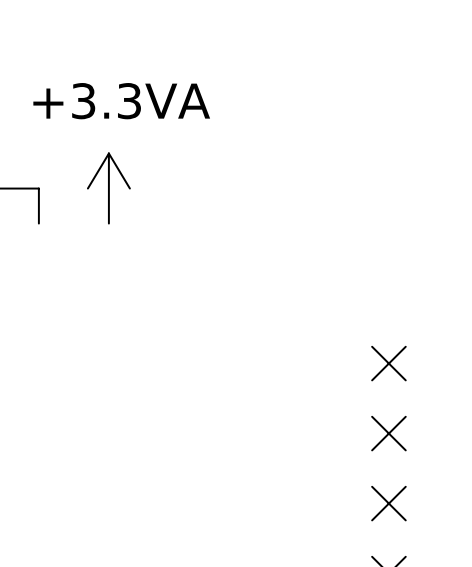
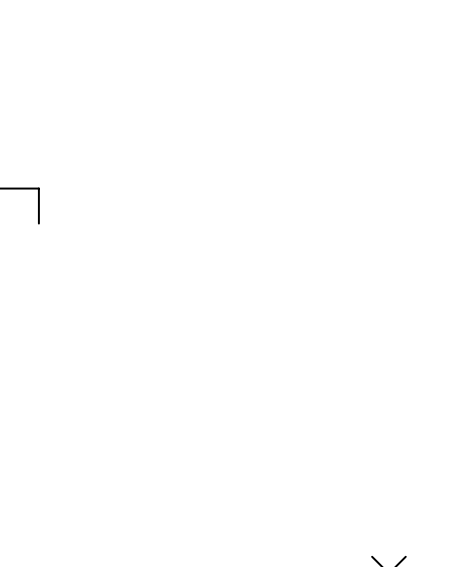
power symbol: +3.3VA (108, 188) -> none
no-connect mark: (388, 363) -> none
no-connect mark: (388, 433) -> none
no-connect mark: (388, 503) -> none

